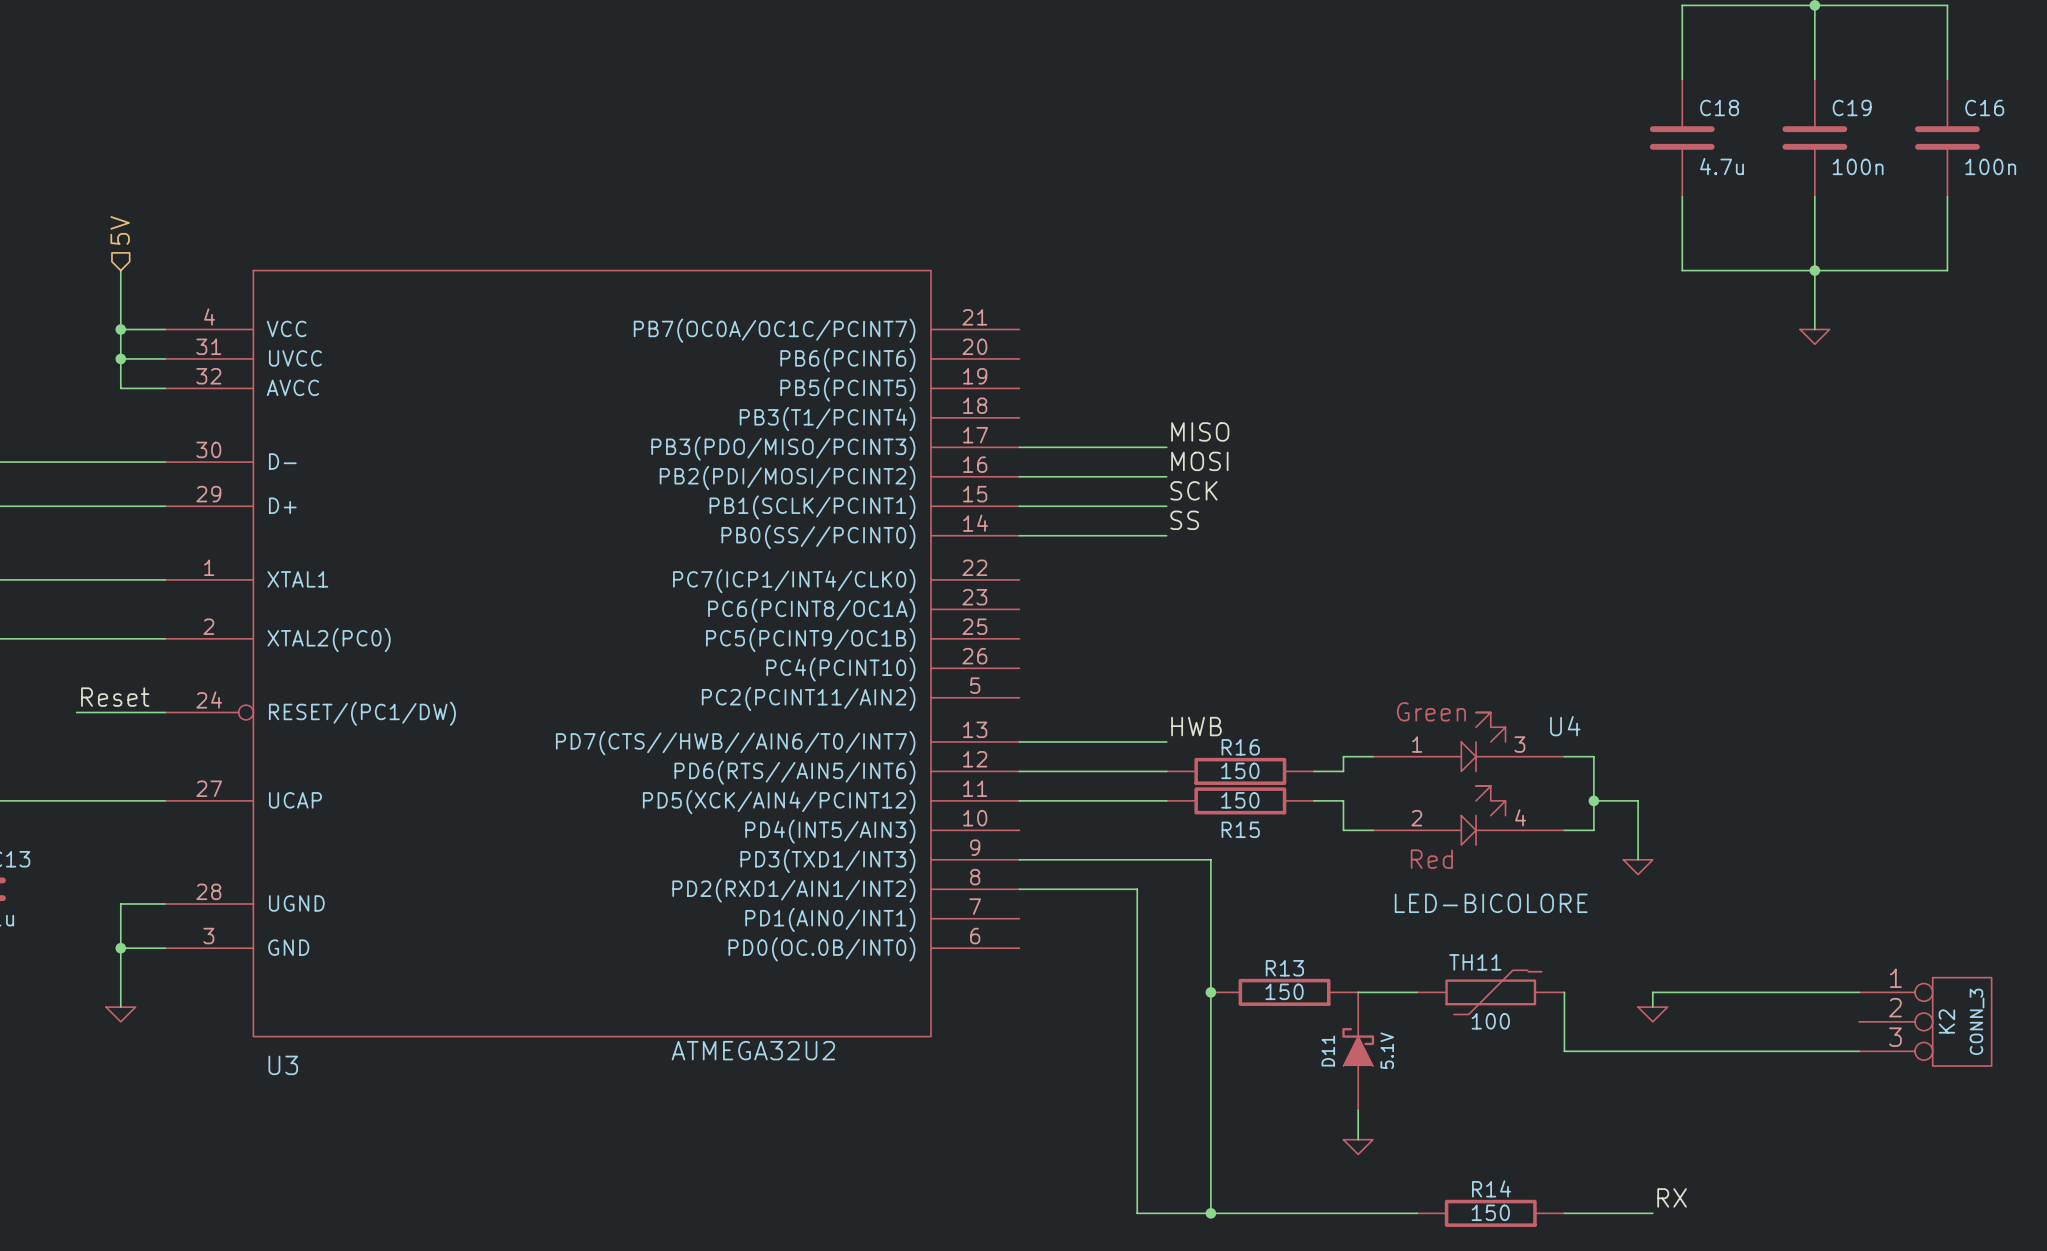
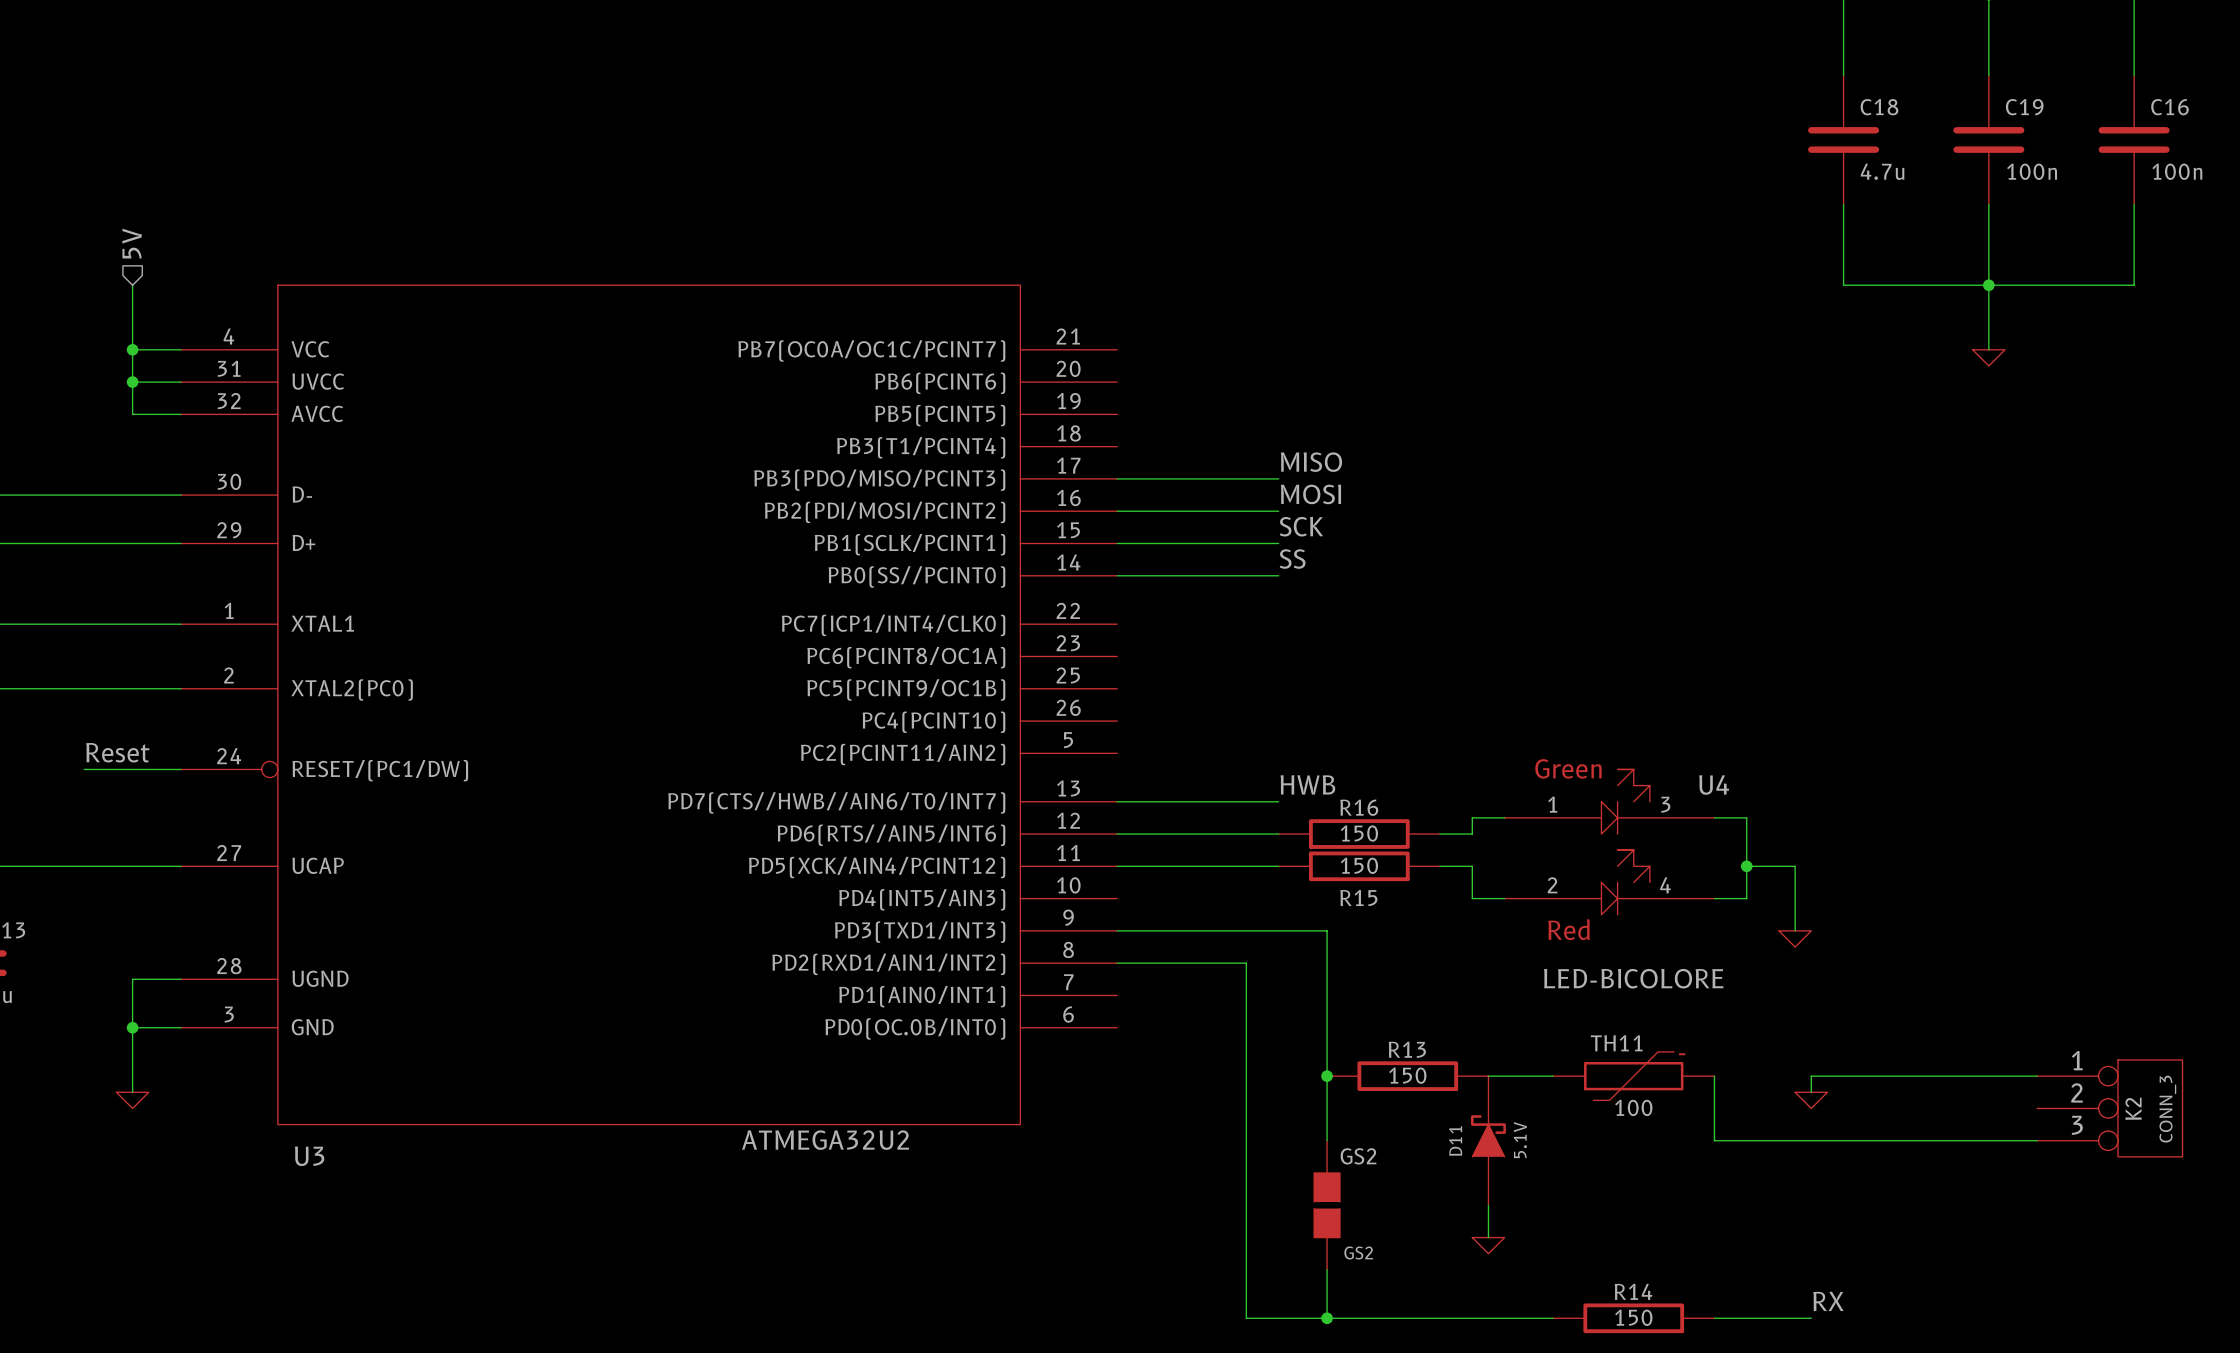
GS2: none -> GS2 (1327, 1205)

